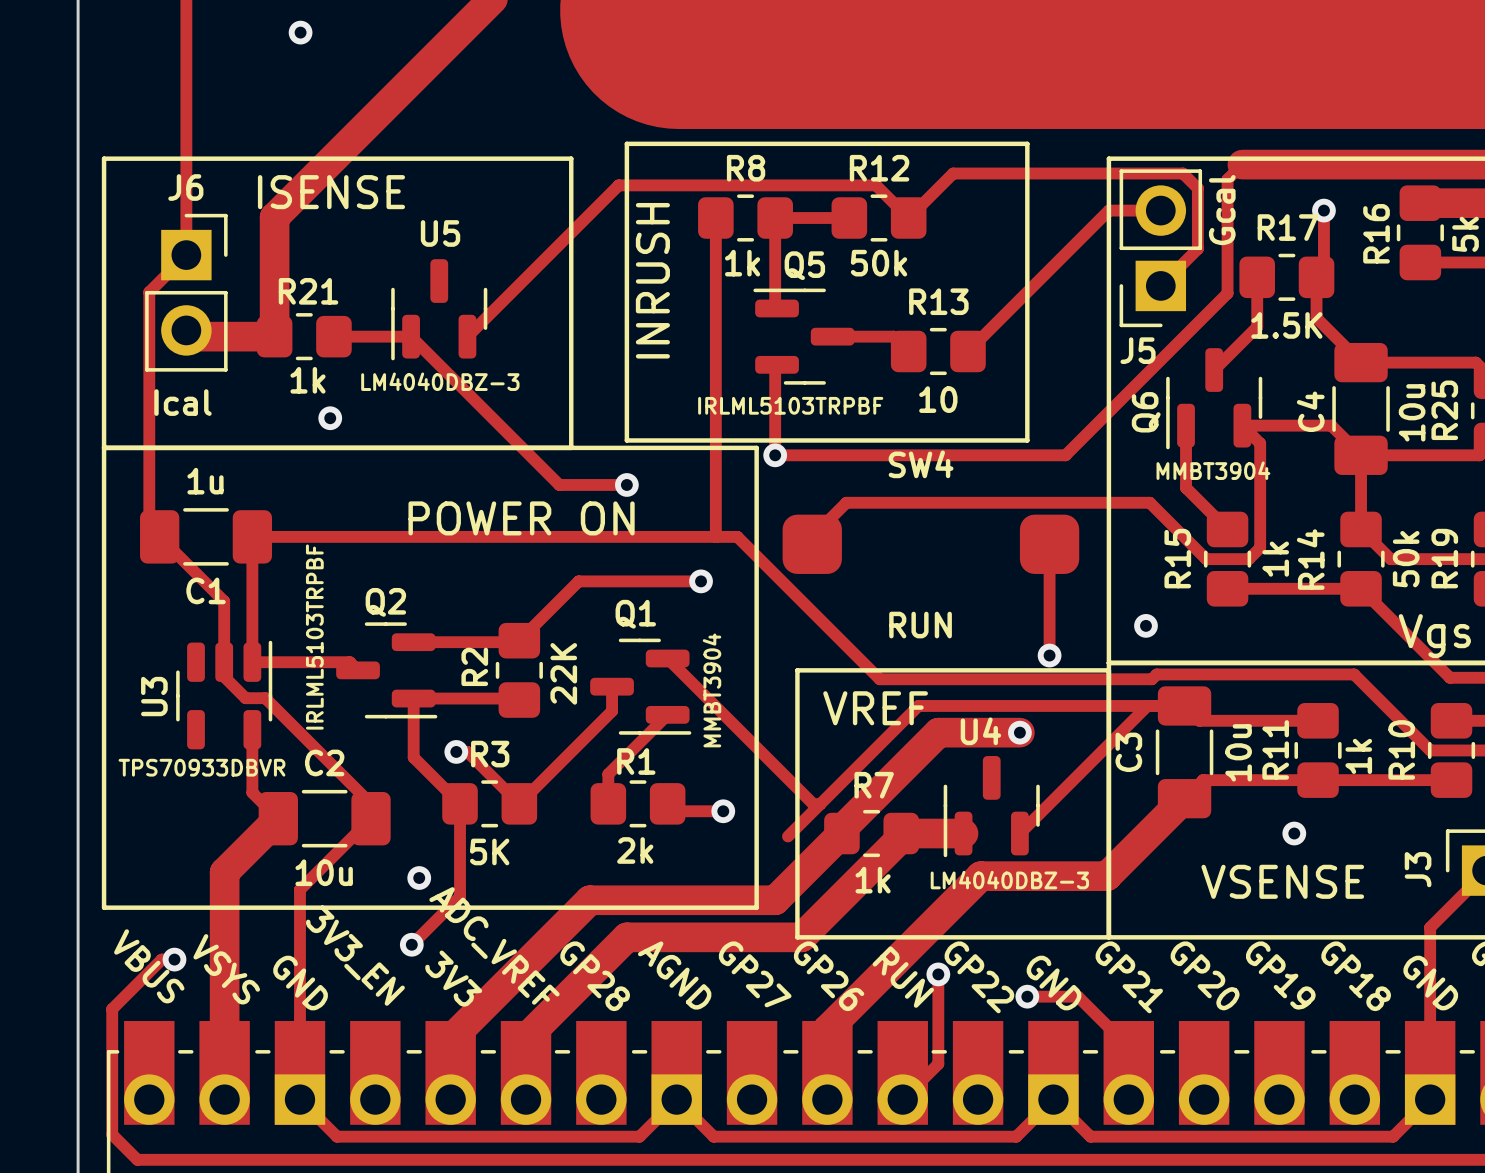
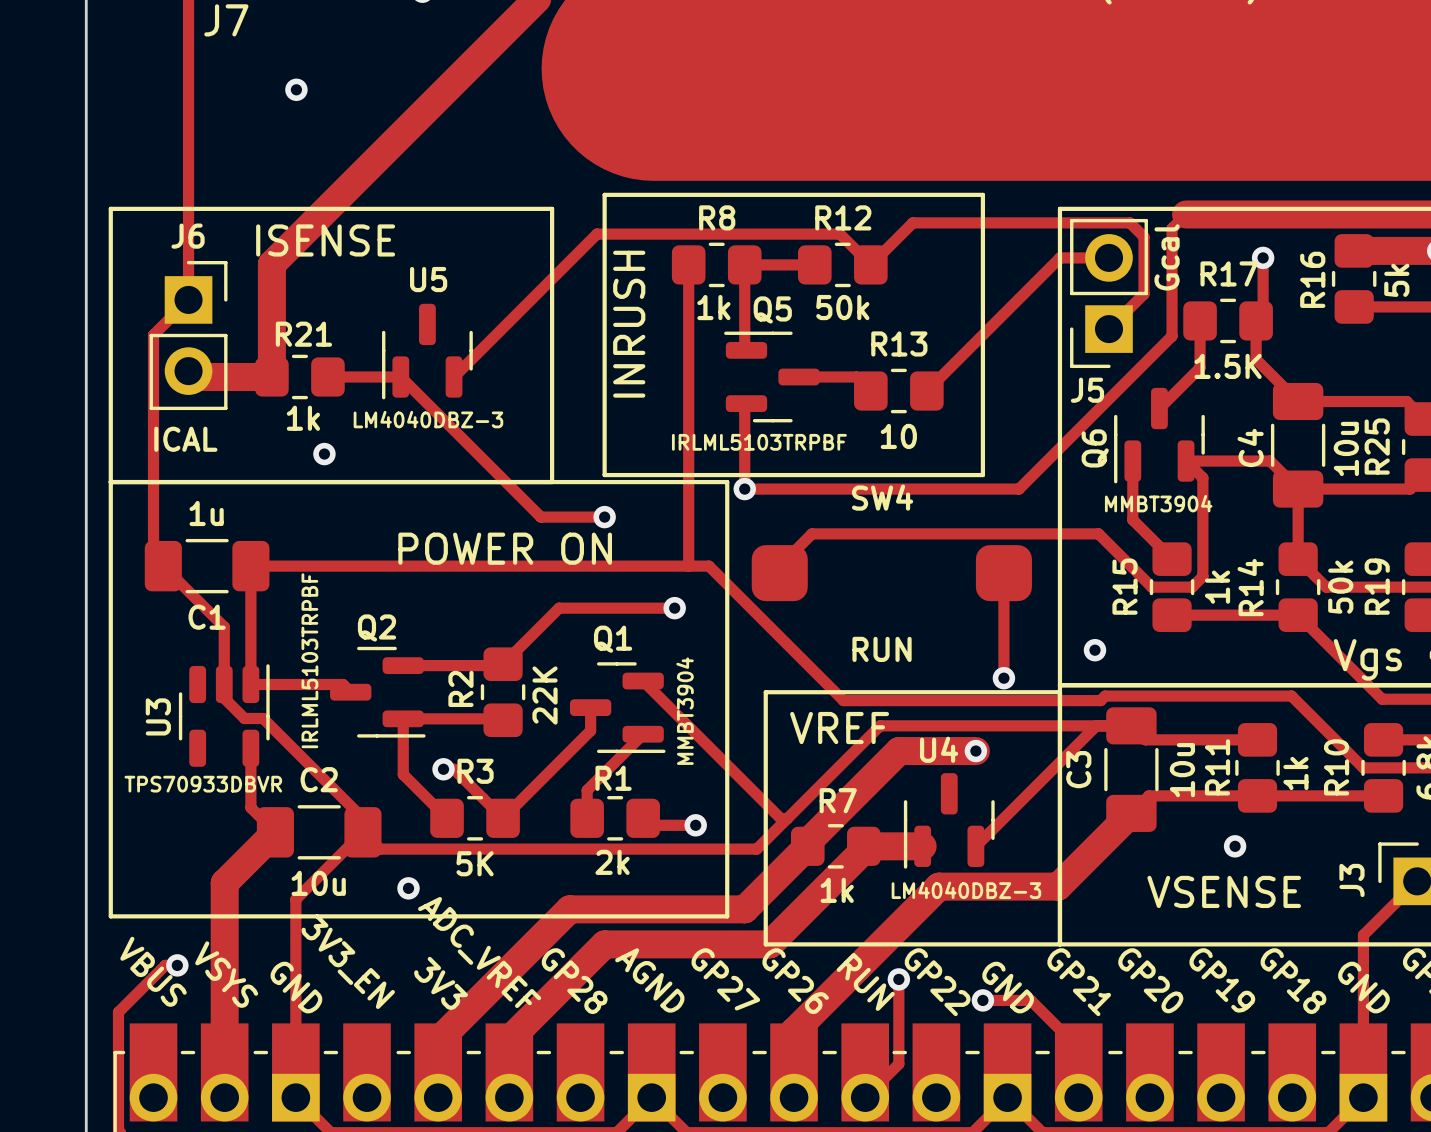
J6 value: Ical (182, 402) -> ICAL (185, 439)
track: (460, 803) (460, 896) (411, 944) -> none
track: none -> (362, 832) (379, 849) (756, 849)
via: (411, 944) -> none

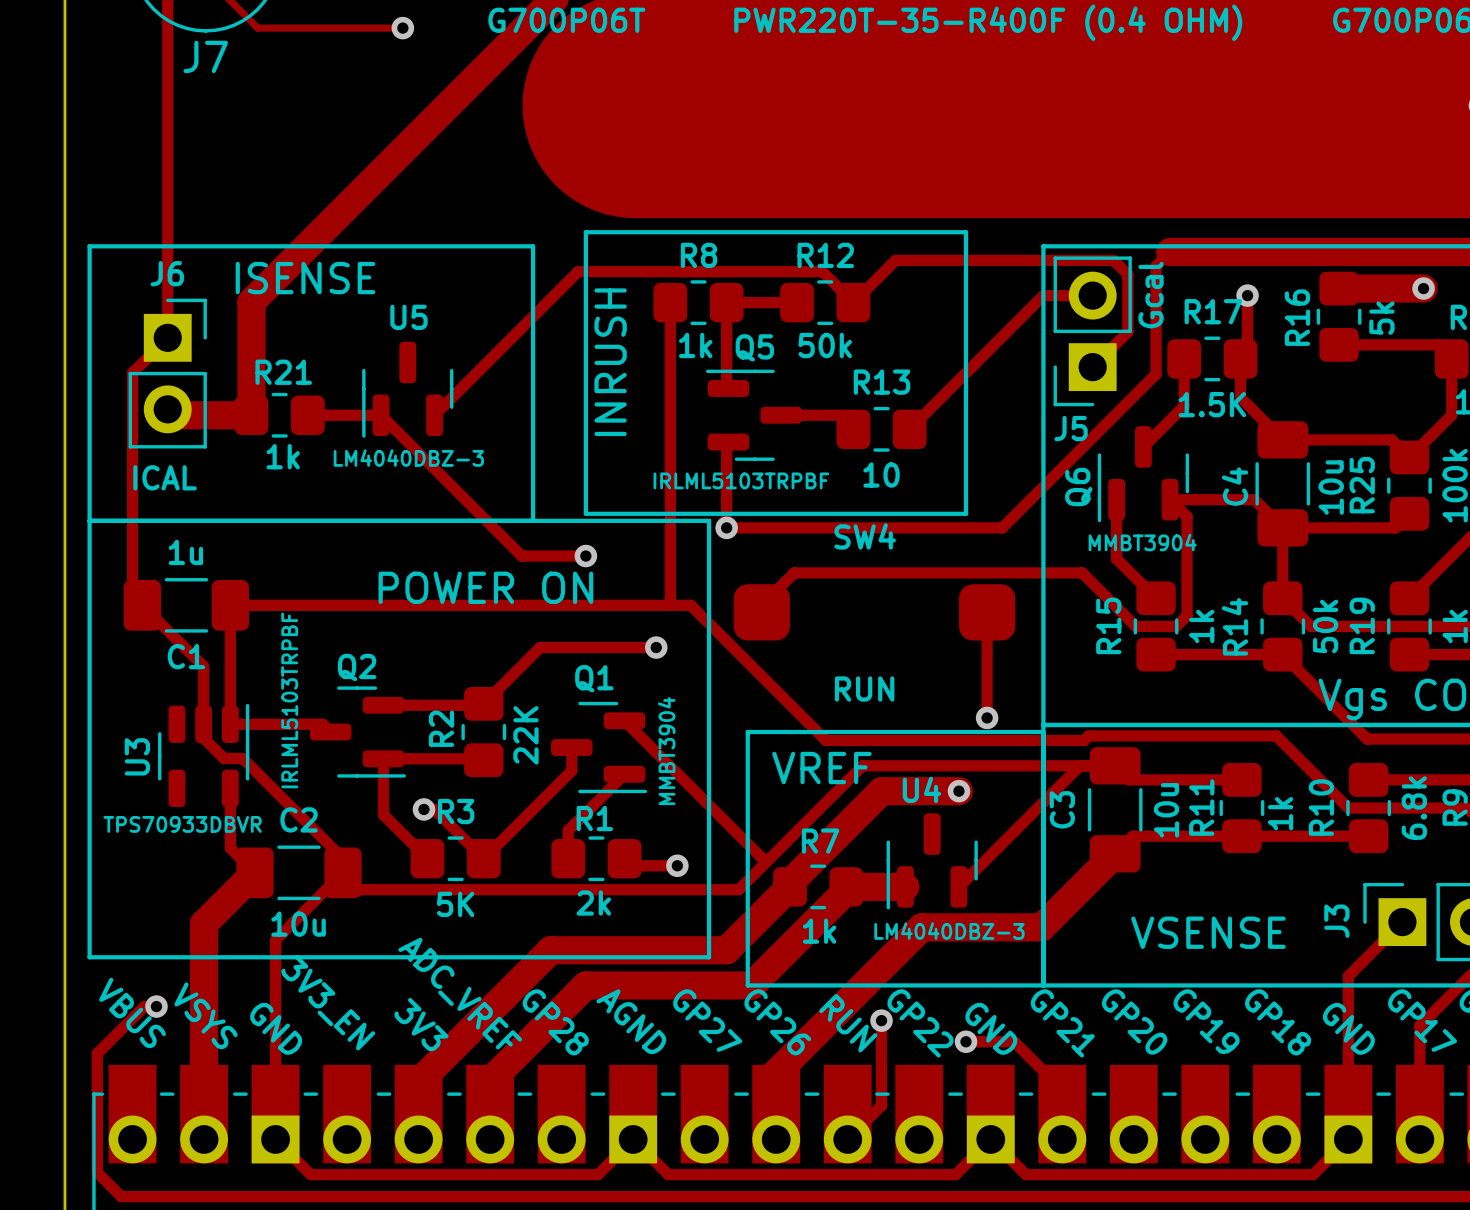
via: (296, 89) -> none
via: (324, 454) -> none
via: (1094, 650) -> none
via: (1235, 846) -> none
via: (408, 888) -> none

